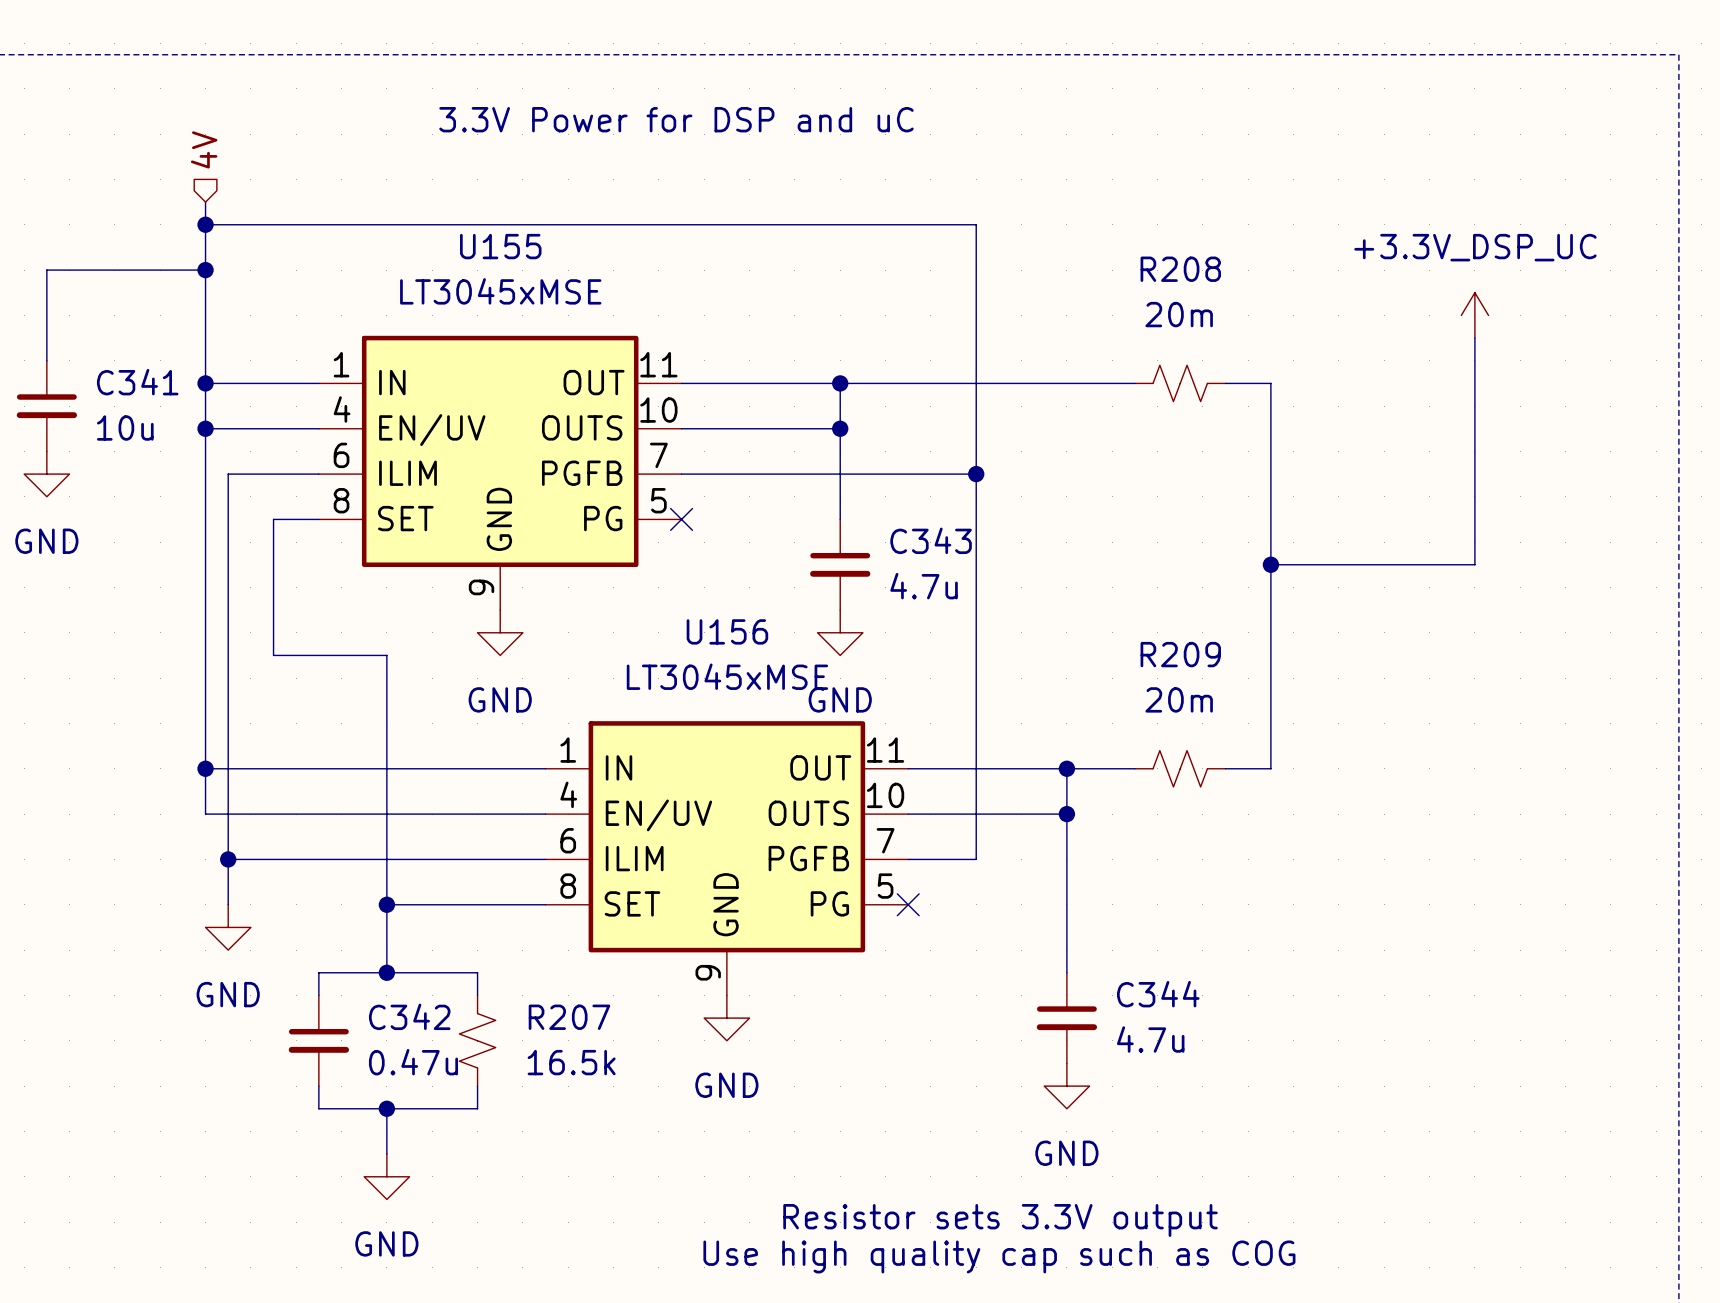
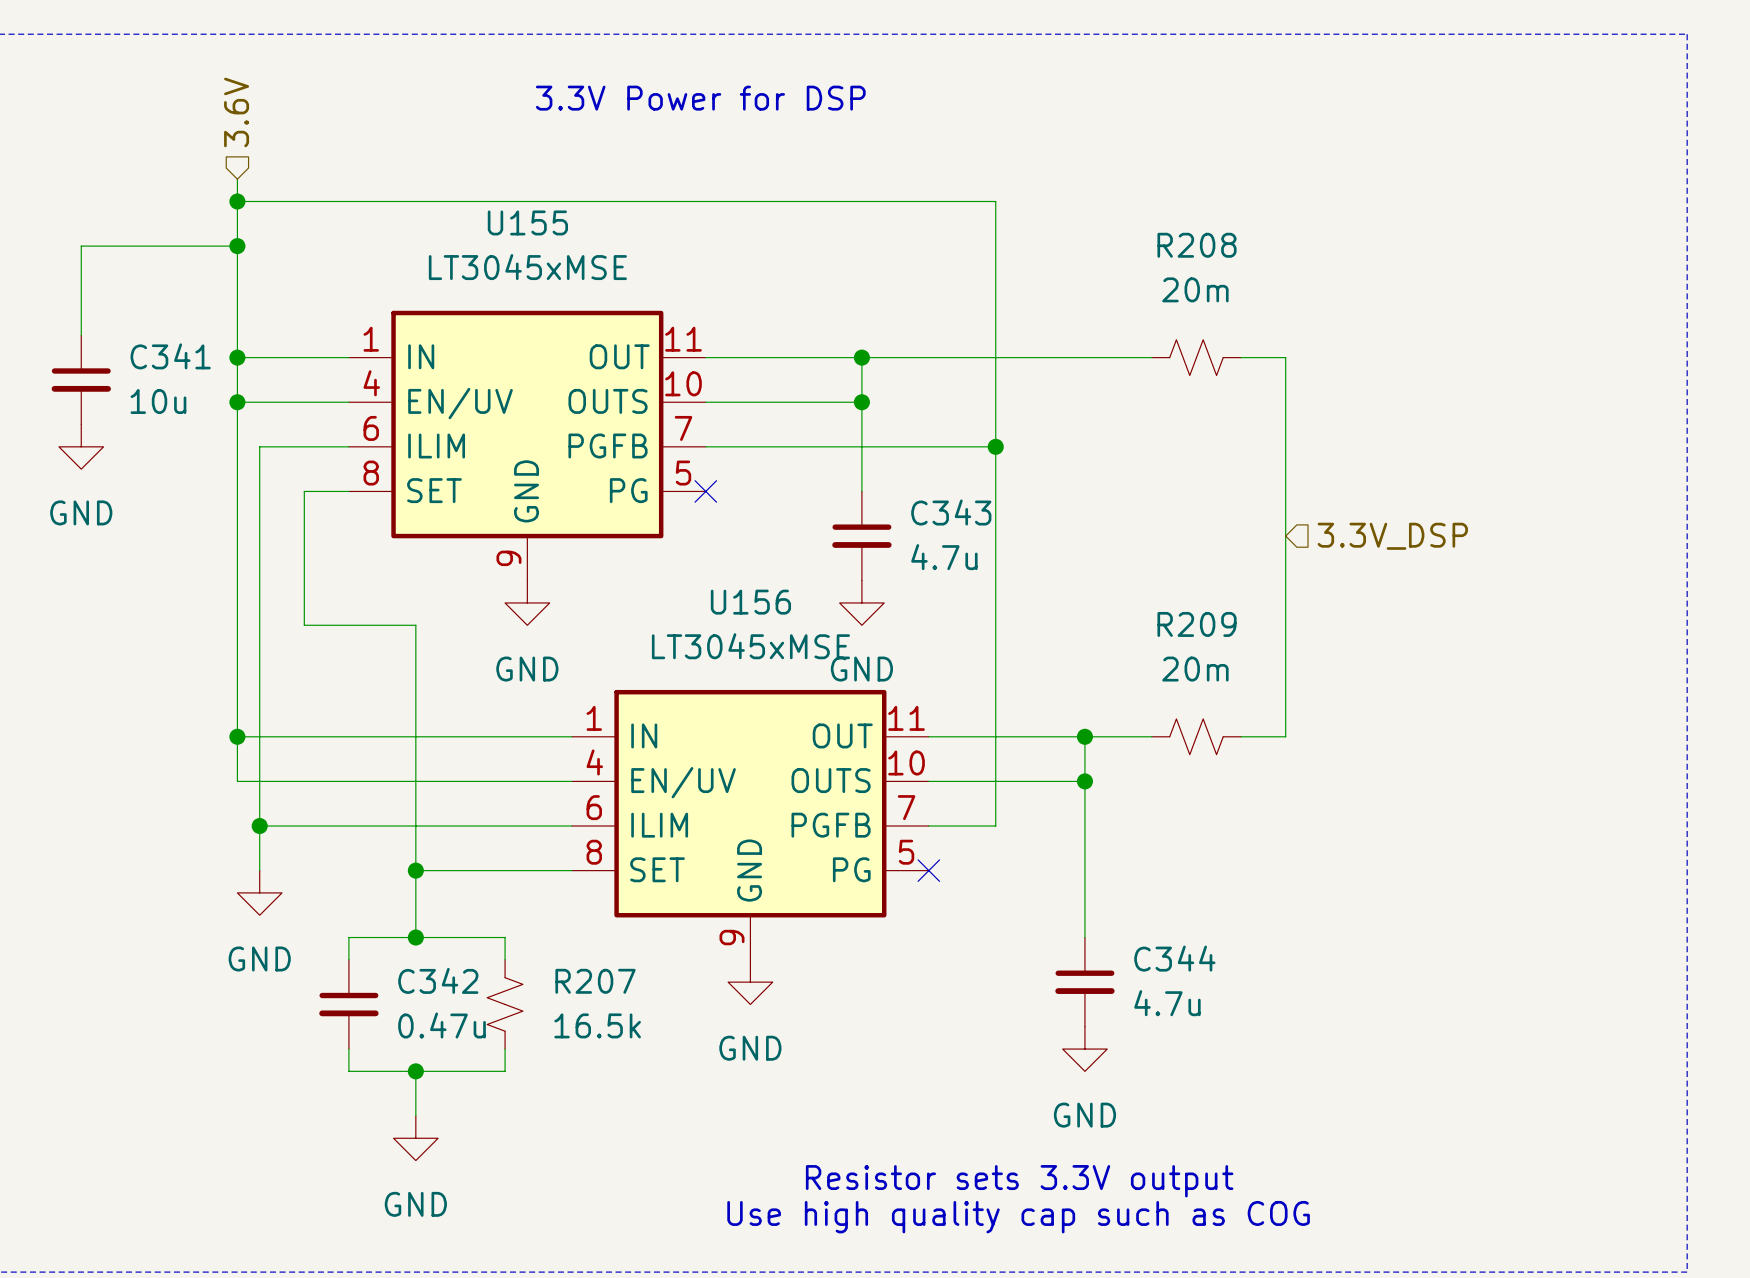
text: 3.3V Power for DSP and uC (676, 119) -> 3.3V Power for DSP (700, 98)
hierarchical label: 4V (204, 149) -> 3.6V (236, 112)
power symbol: +3.3V_DSP_UC (1474, 315) -> none
wire: (1474, 338) (1474, 564) (1270, 564) -> none
junction: (1270, 564) -> none
hierarchical label: none -> 3.3V_DSP (1392, 536)

